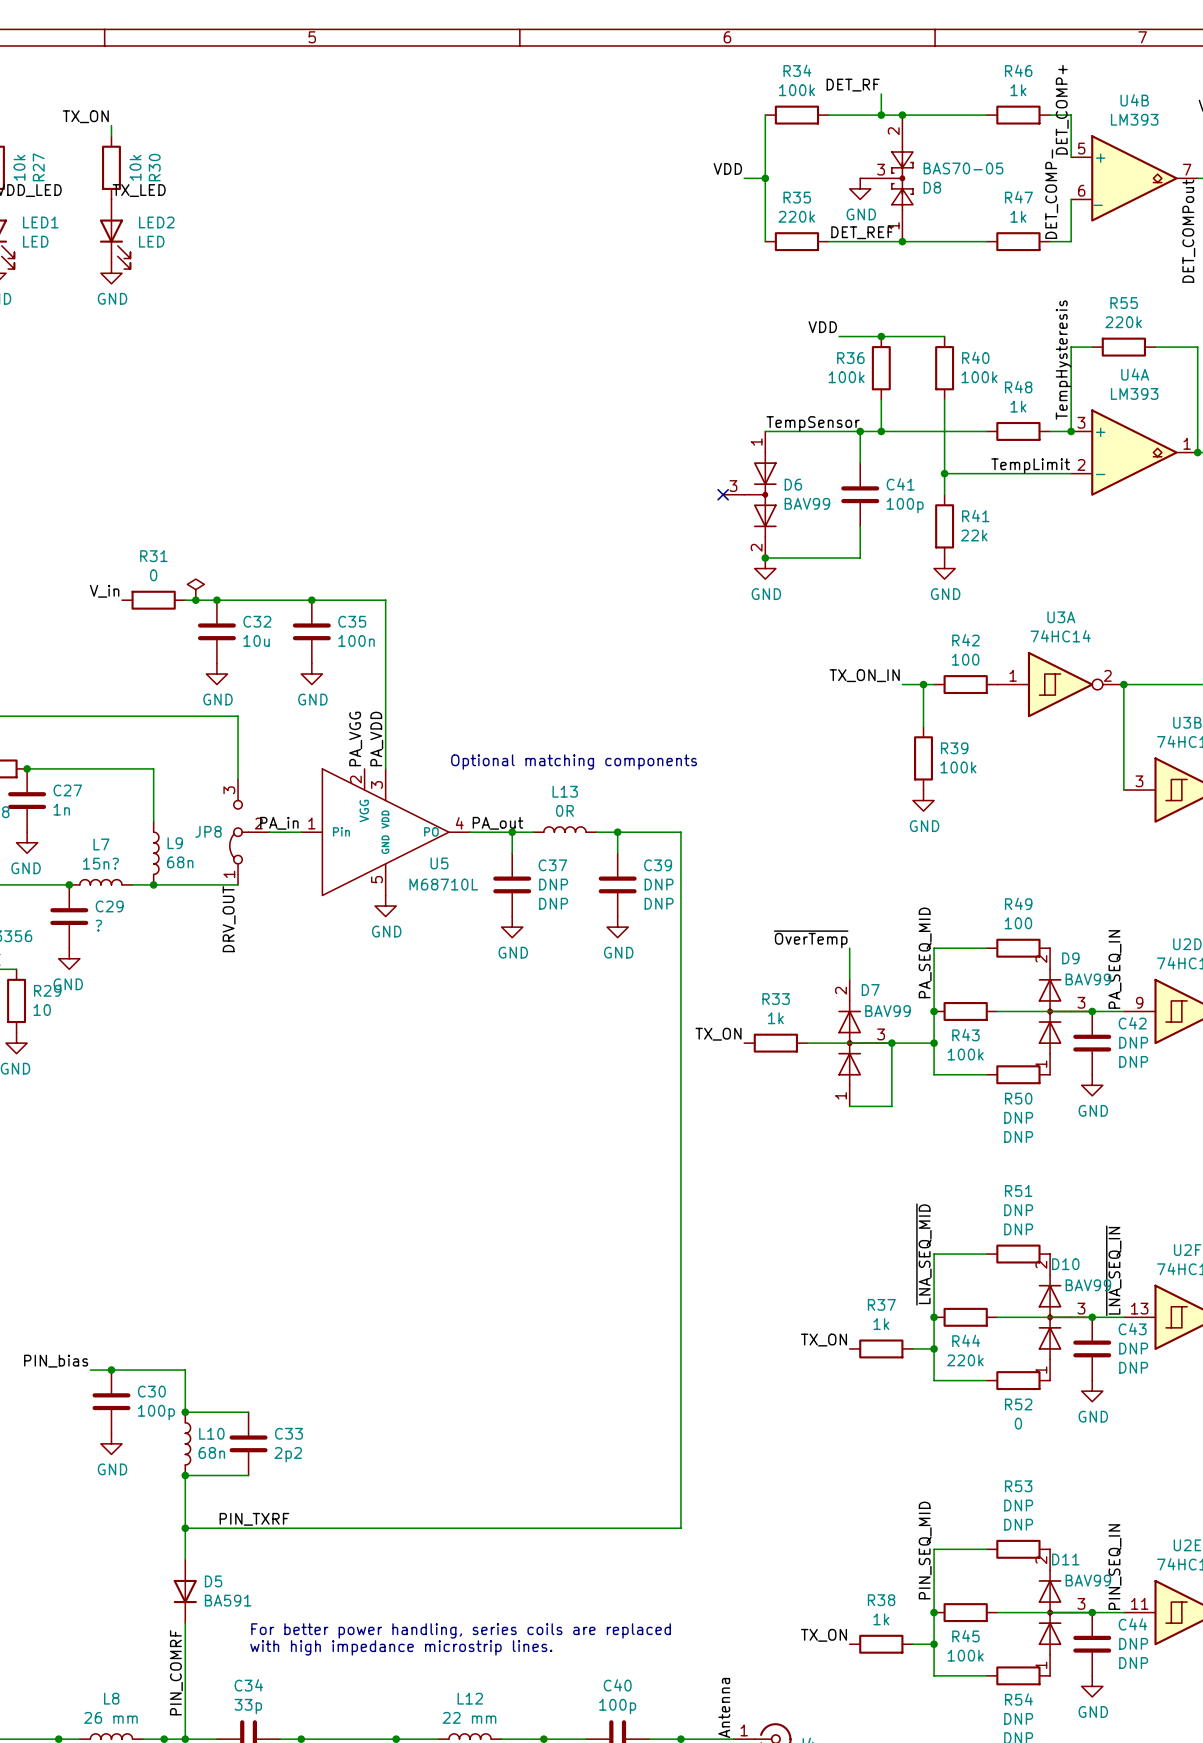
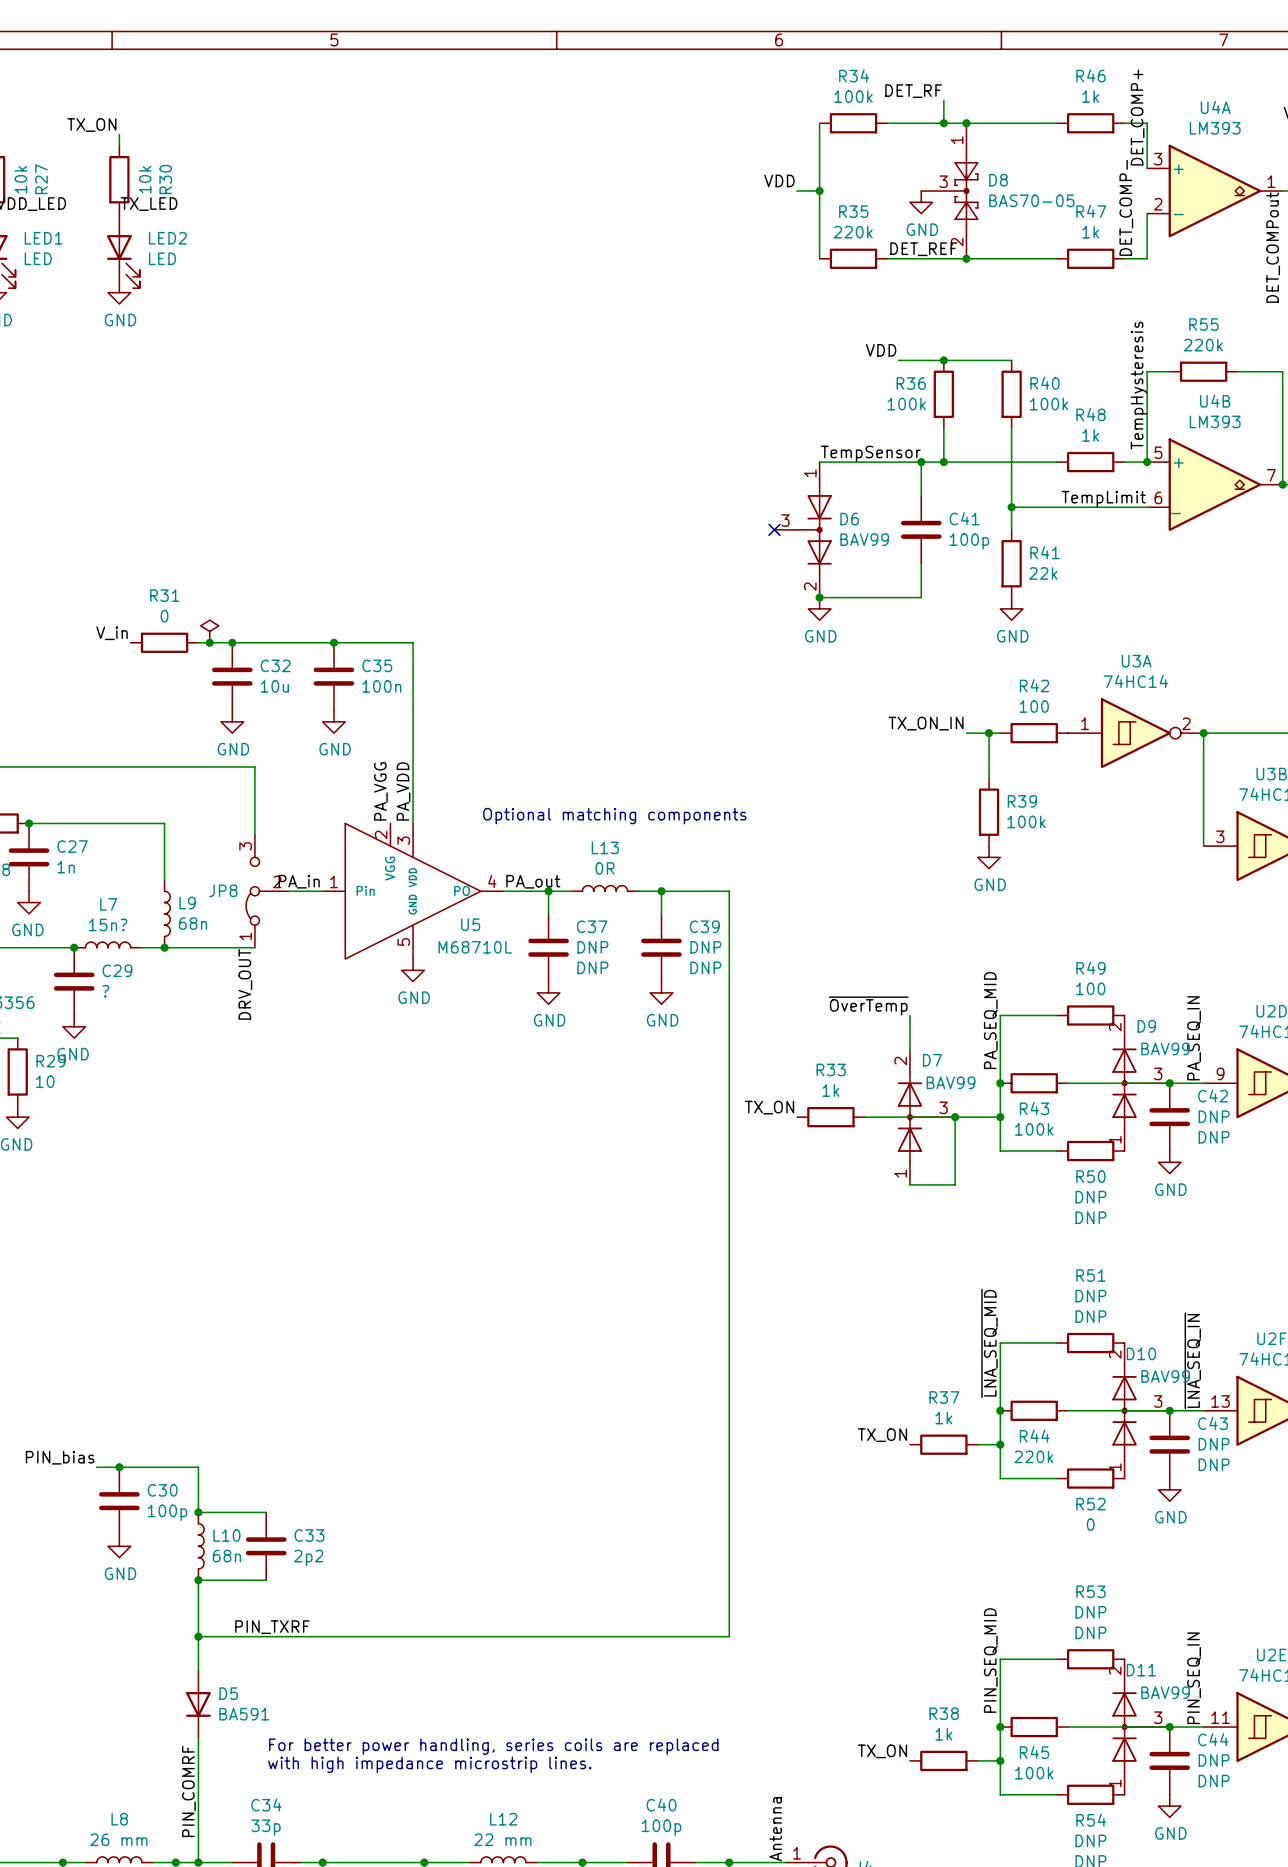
D8 flip: as is (902, 178) -> up-down (966, 191)
U4B position: (1134, 178) -> (1214, 484)
U4A position: (1134, 452) -> (1214, 191)

